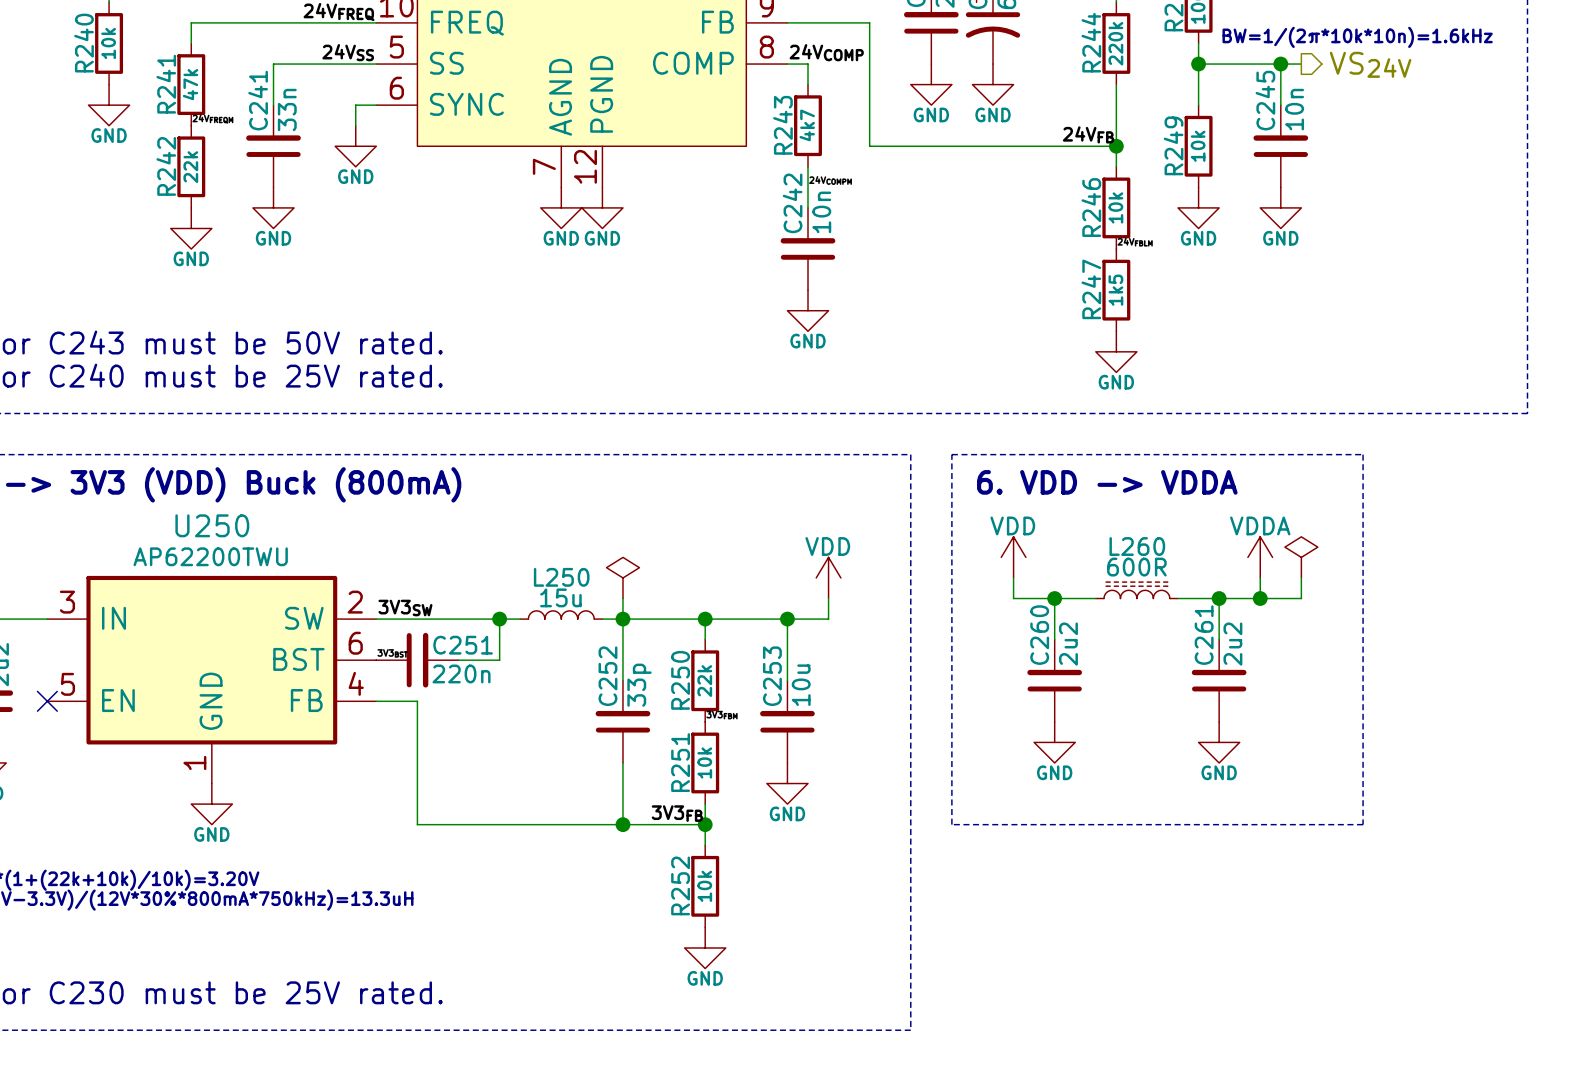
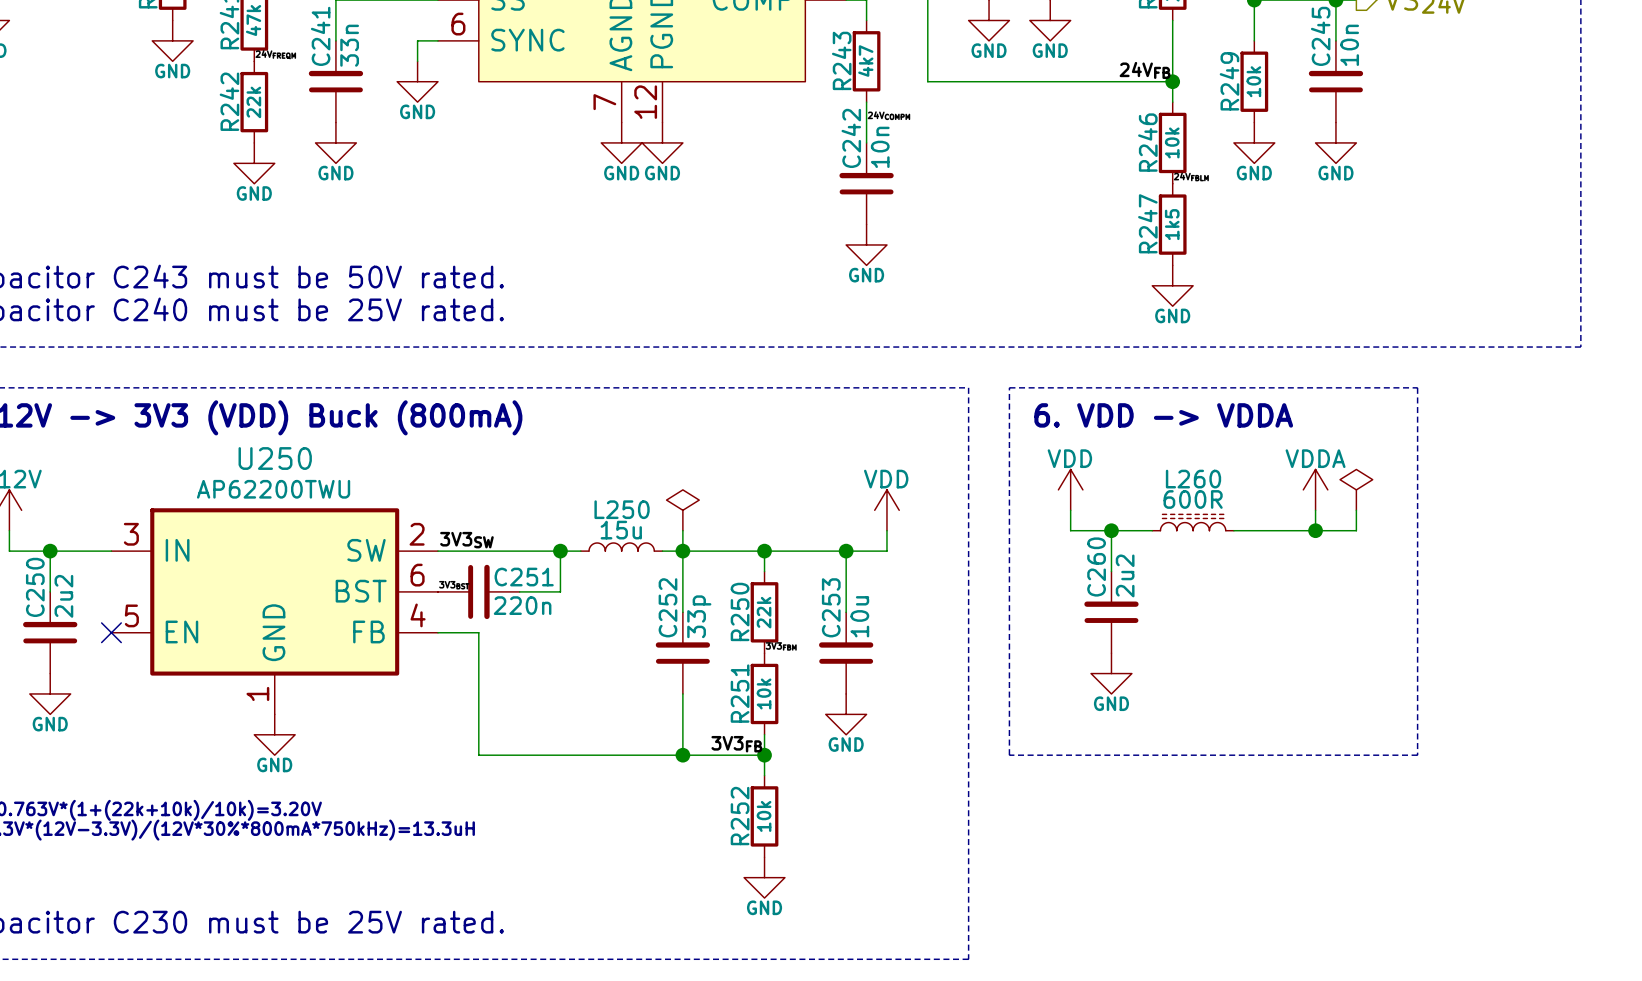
wire: (1219, 598) (1219, 639) -> none
junction: (1219, 598) -> none
C261: 2u2 (1219, 680) -> none
power symbol: GND (1219, 742) -> none

